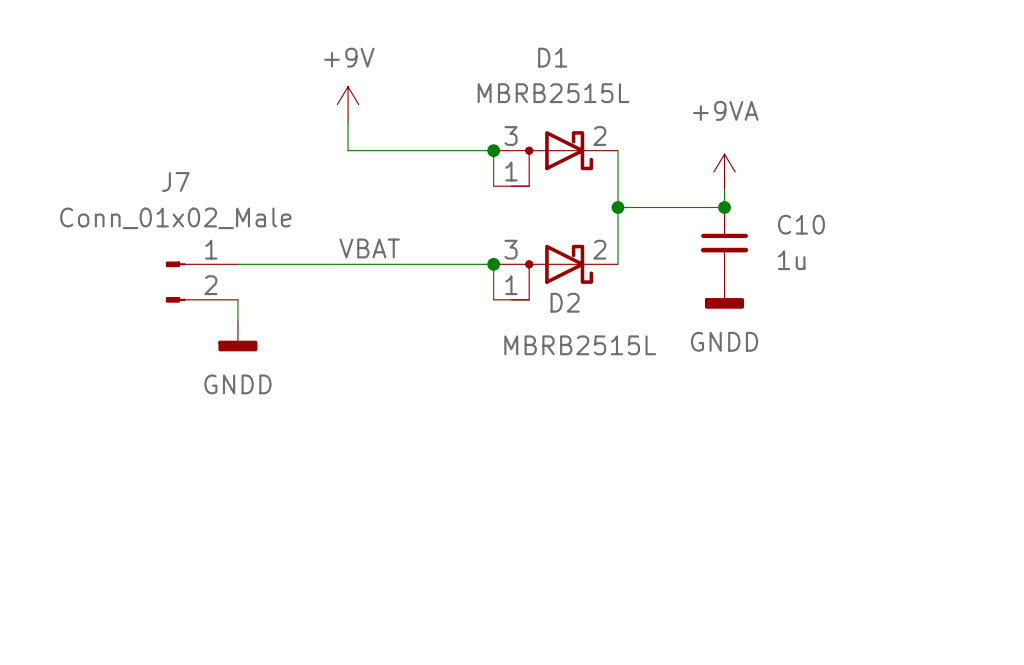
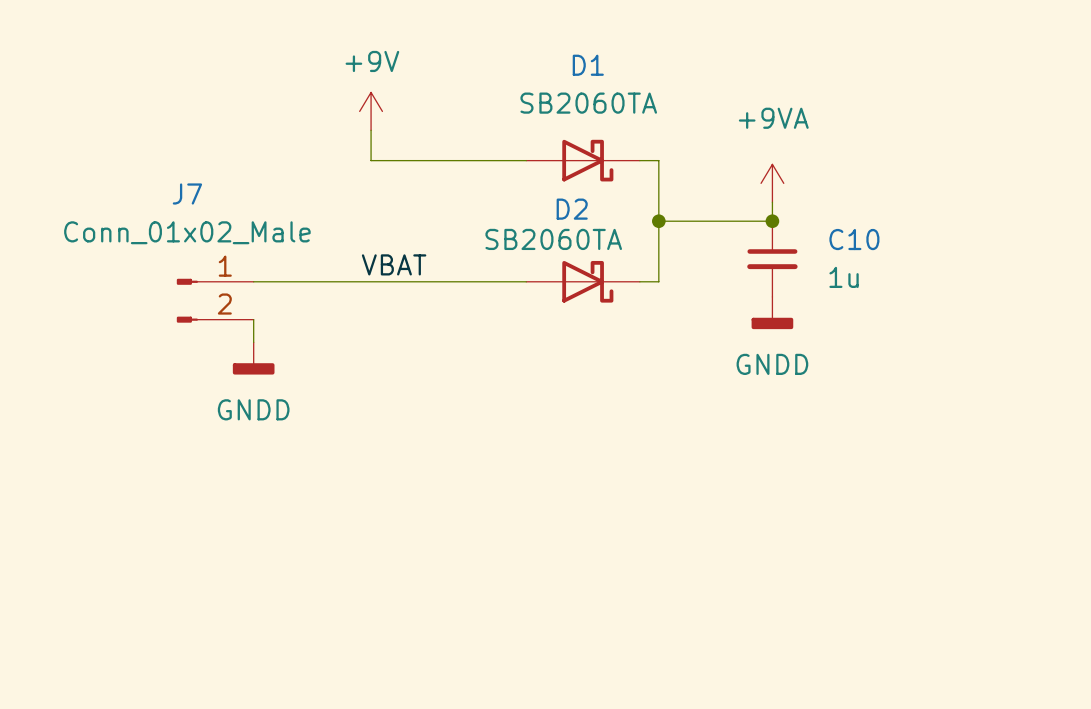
D1 value: MBRB2515L (553, 93) -> SB2060TA (588, 103)
D1 symbol: [493, 131, 618, 187] -> [526, 139, 640, 182]
wire: (493, 150) (493, 186) -> none
junction: (493, 150) -> none
D2 symbol: [493, 244, 618, 300] -> [526, 260, 640, 303]
wire: (493, 264) (493, 299) -> none
junction: (493, 264) -> none
D2 name position: D2 (565, 302) -> D2 (572, 209)
D2 value: MBRB2515L (580, 345) -> SB2060TA (553, 239)

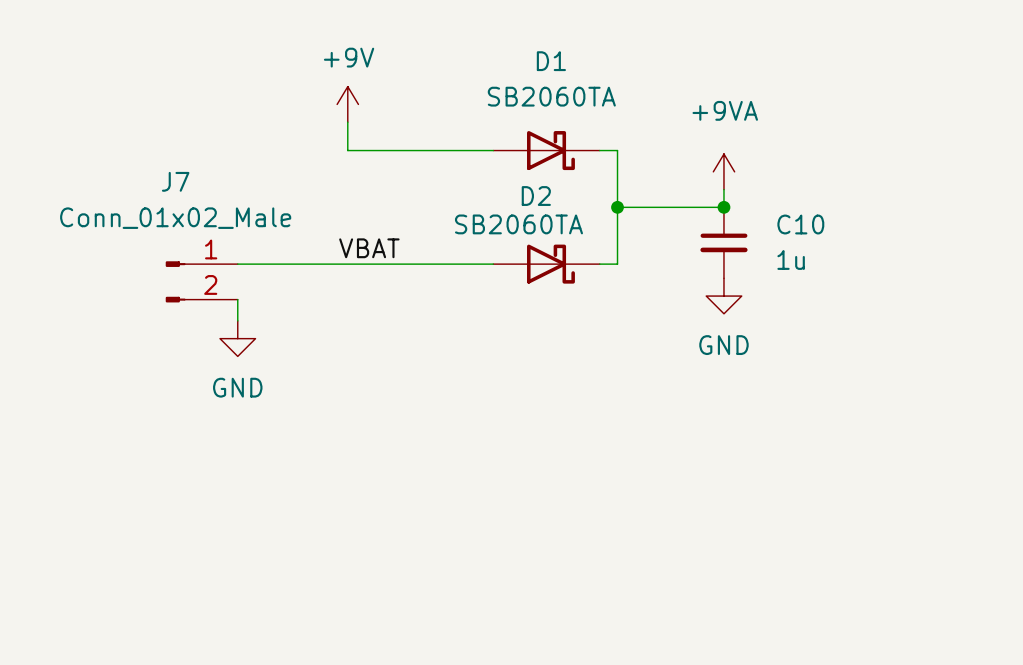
power symbol: GNDD (772, 313) -> GND (723, 296)
power symbol: GNDD (253, 358) -> GND (237, 338)

